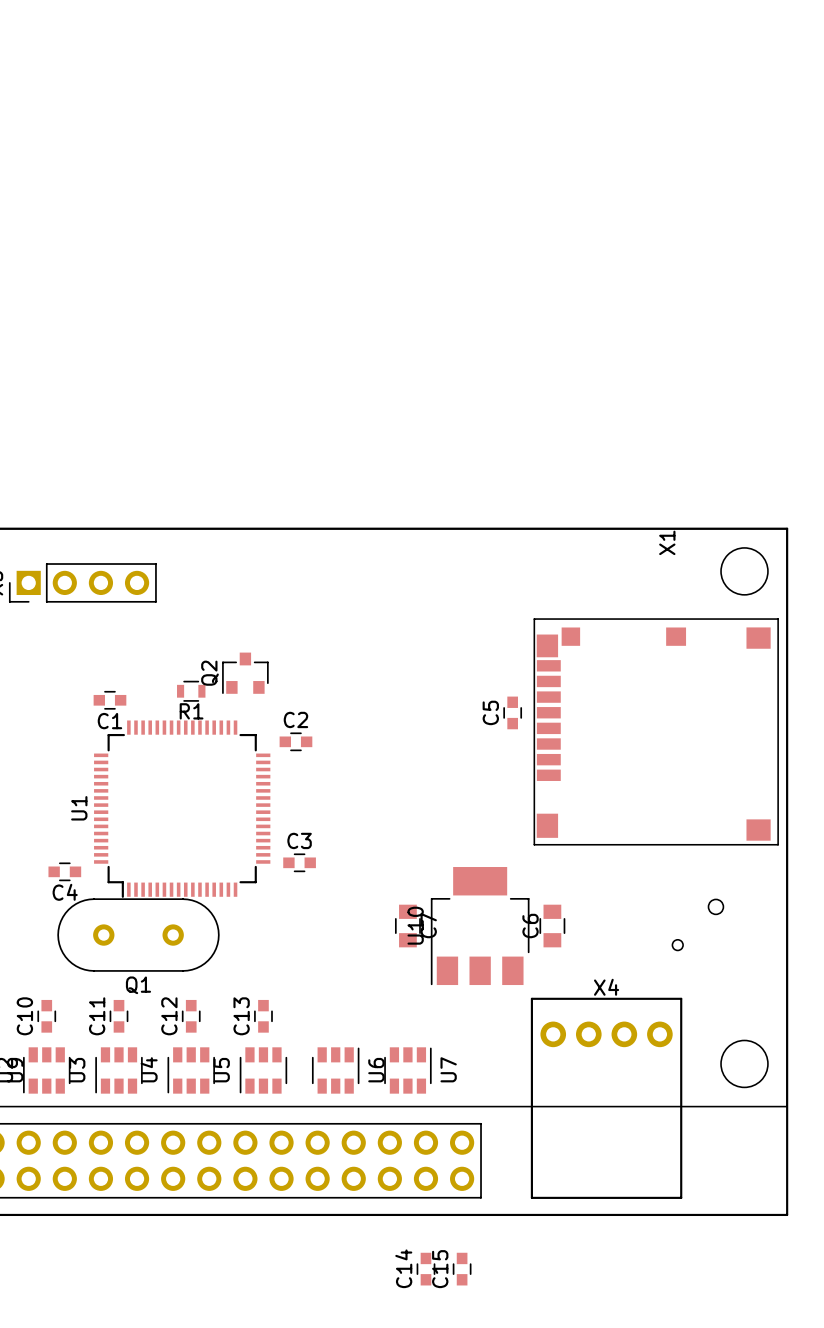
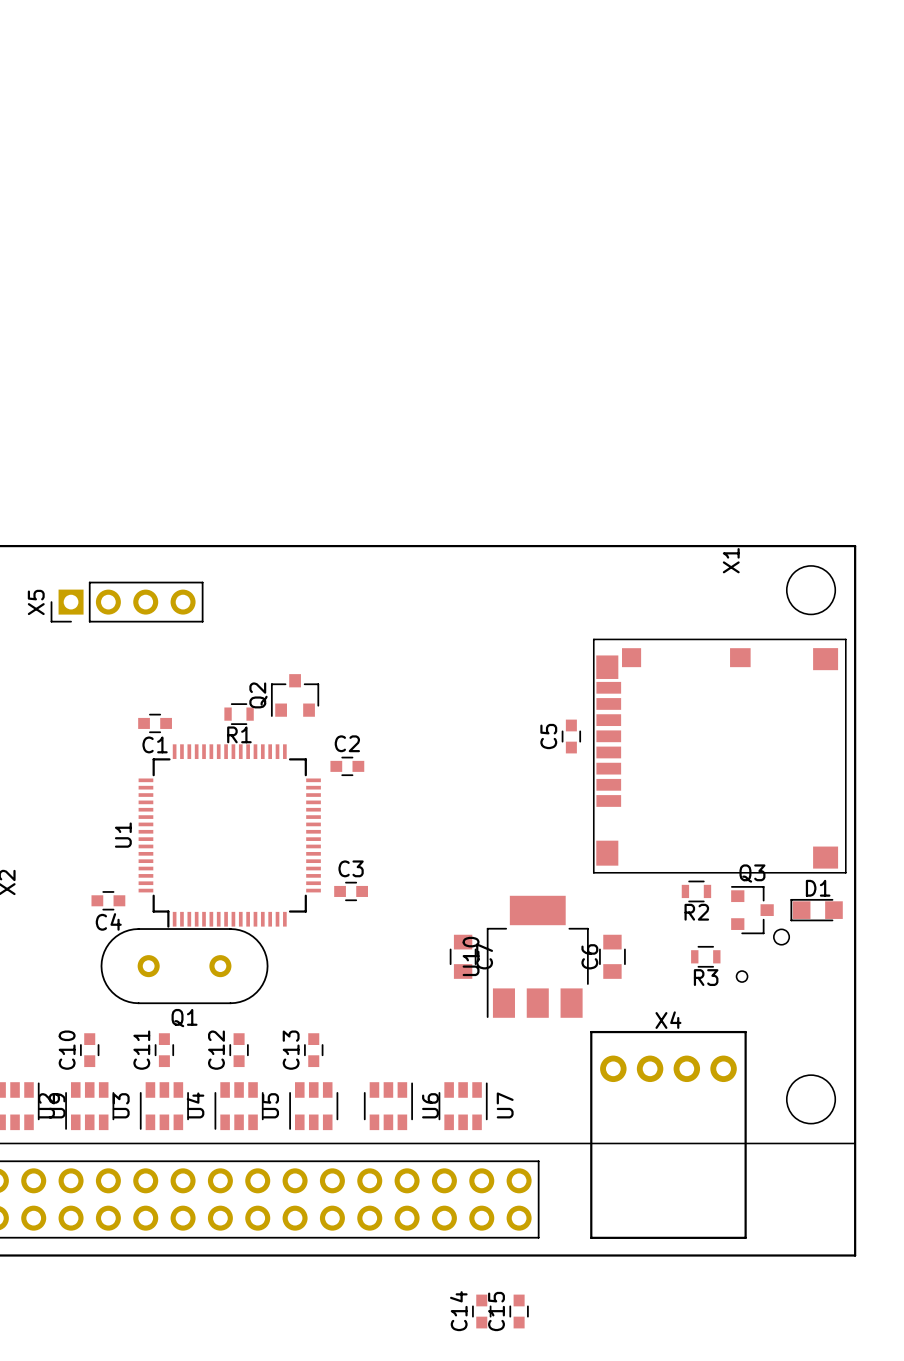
R2: none -> (696, 891)
Q3: none -> (752, 910)
D1: none -> (816, 910)
R3: none -> (705, 956)

